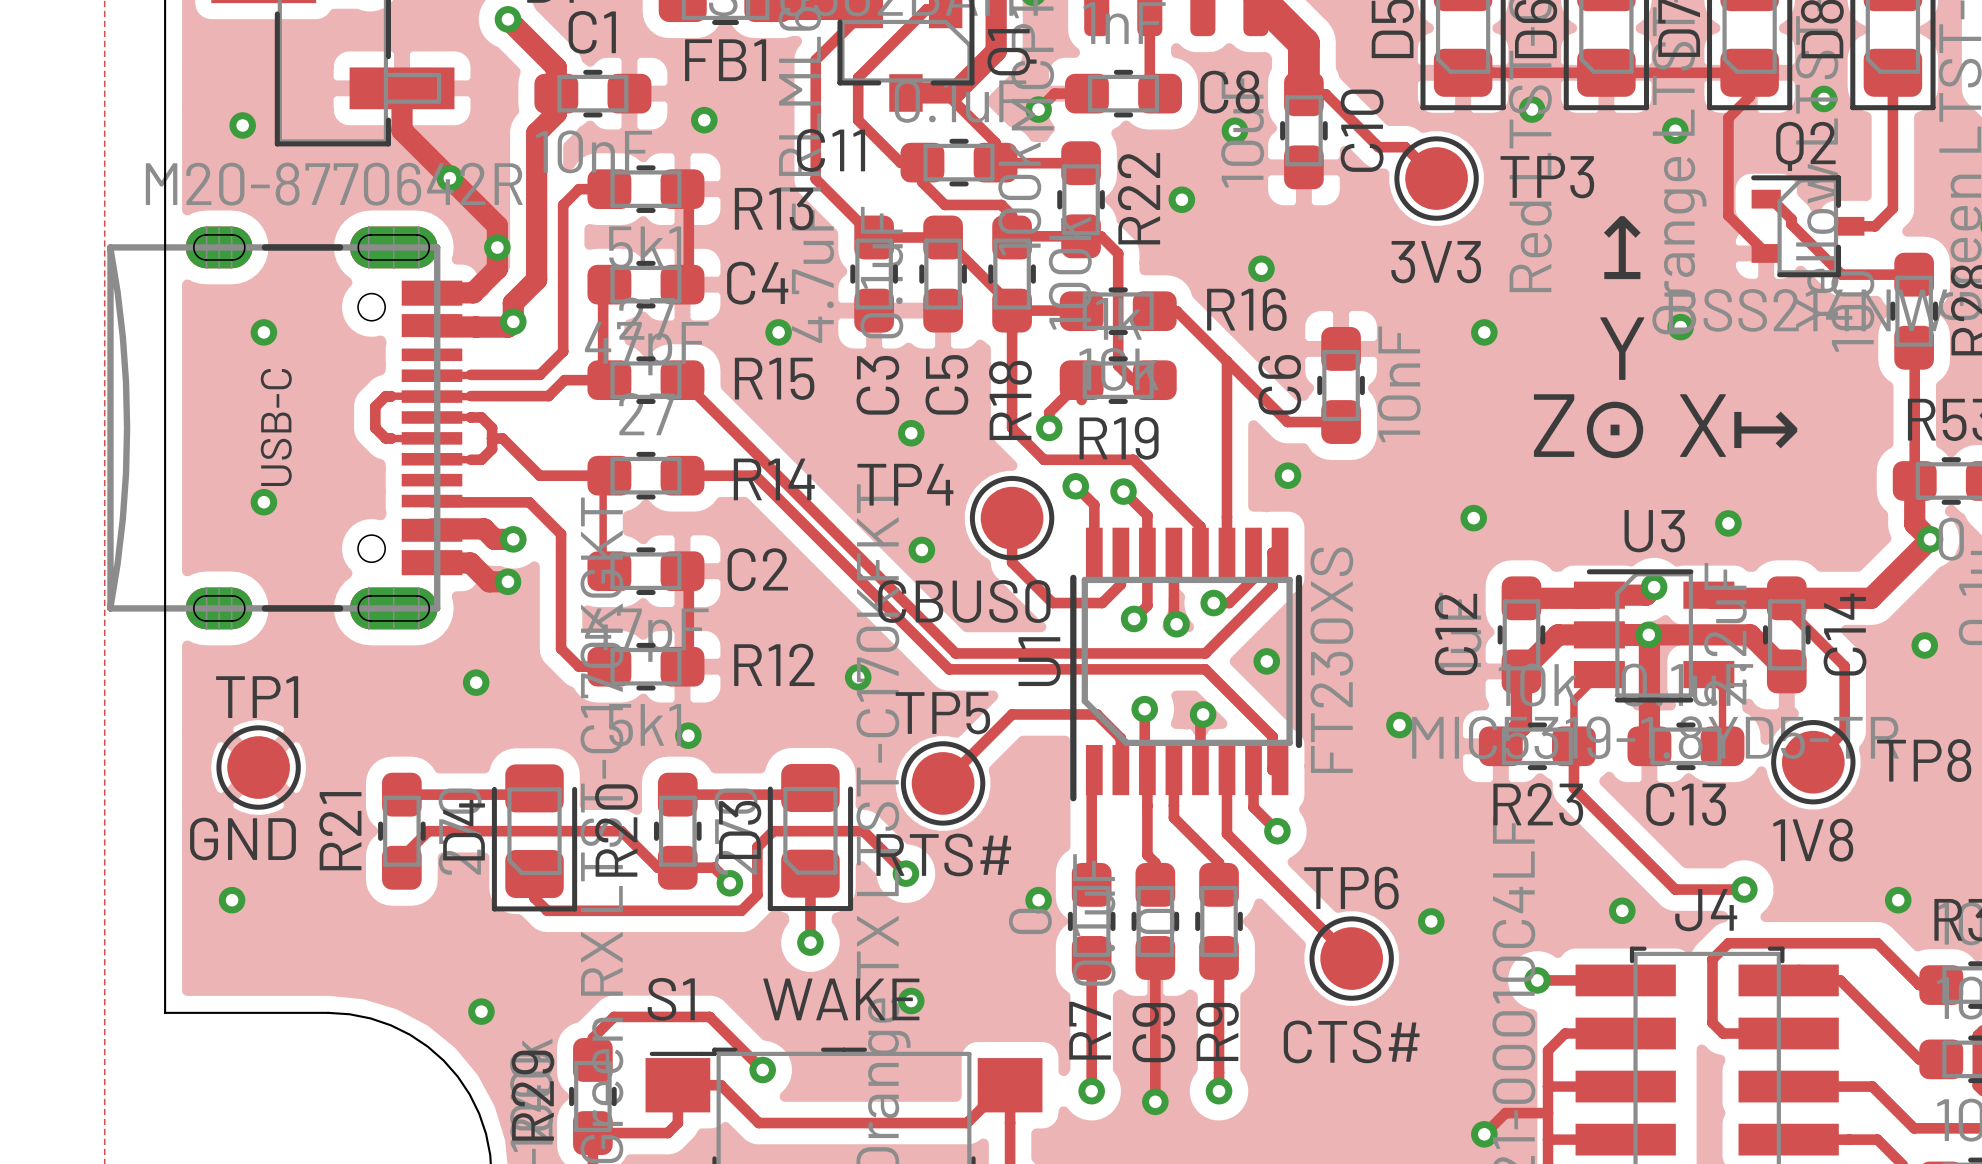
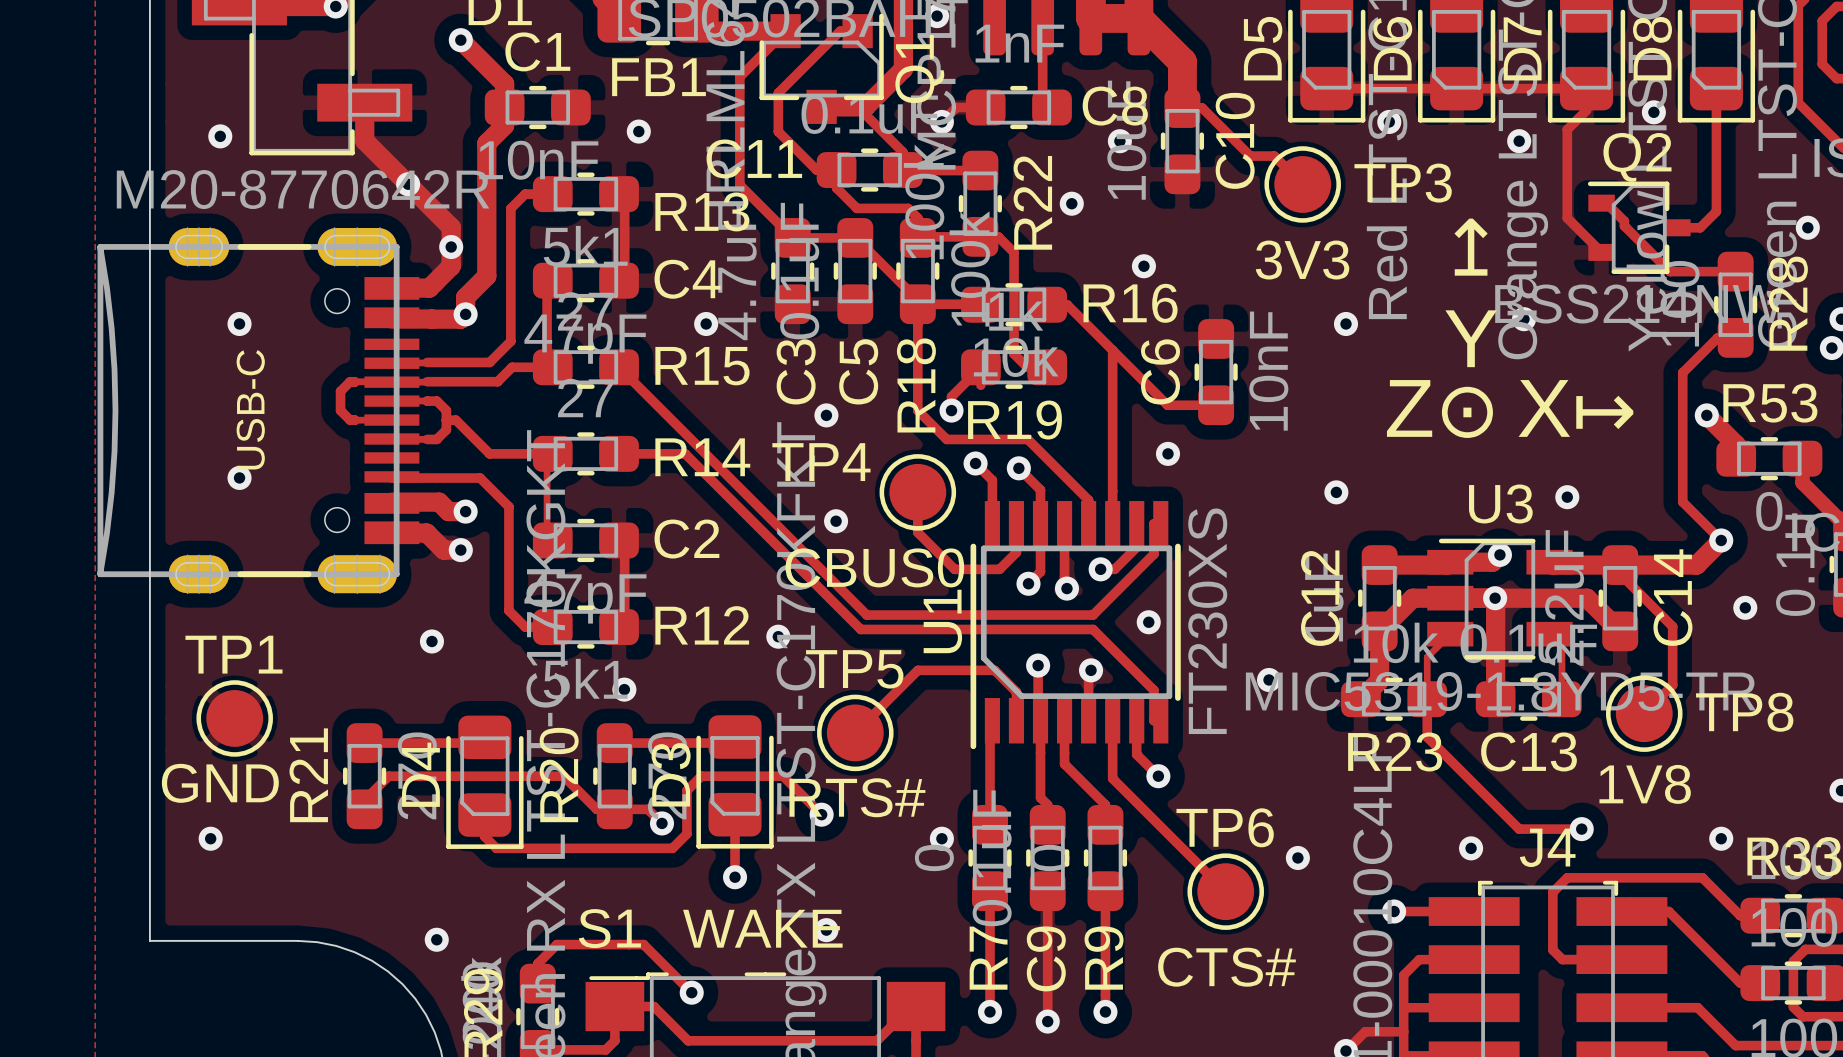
track: (1914, 348) (1914, 465) -> (1706, 415) (1736, 444)
via: none -> (1706, 415)
track: (1914, 480) (1914, 524) (1930, 539) (1898, 571) -> (1735, 337) (1717, 337) (1682, 372) (1682, 501) (1721, 540)
via position: (1930, 539) -> (1721, 540)

